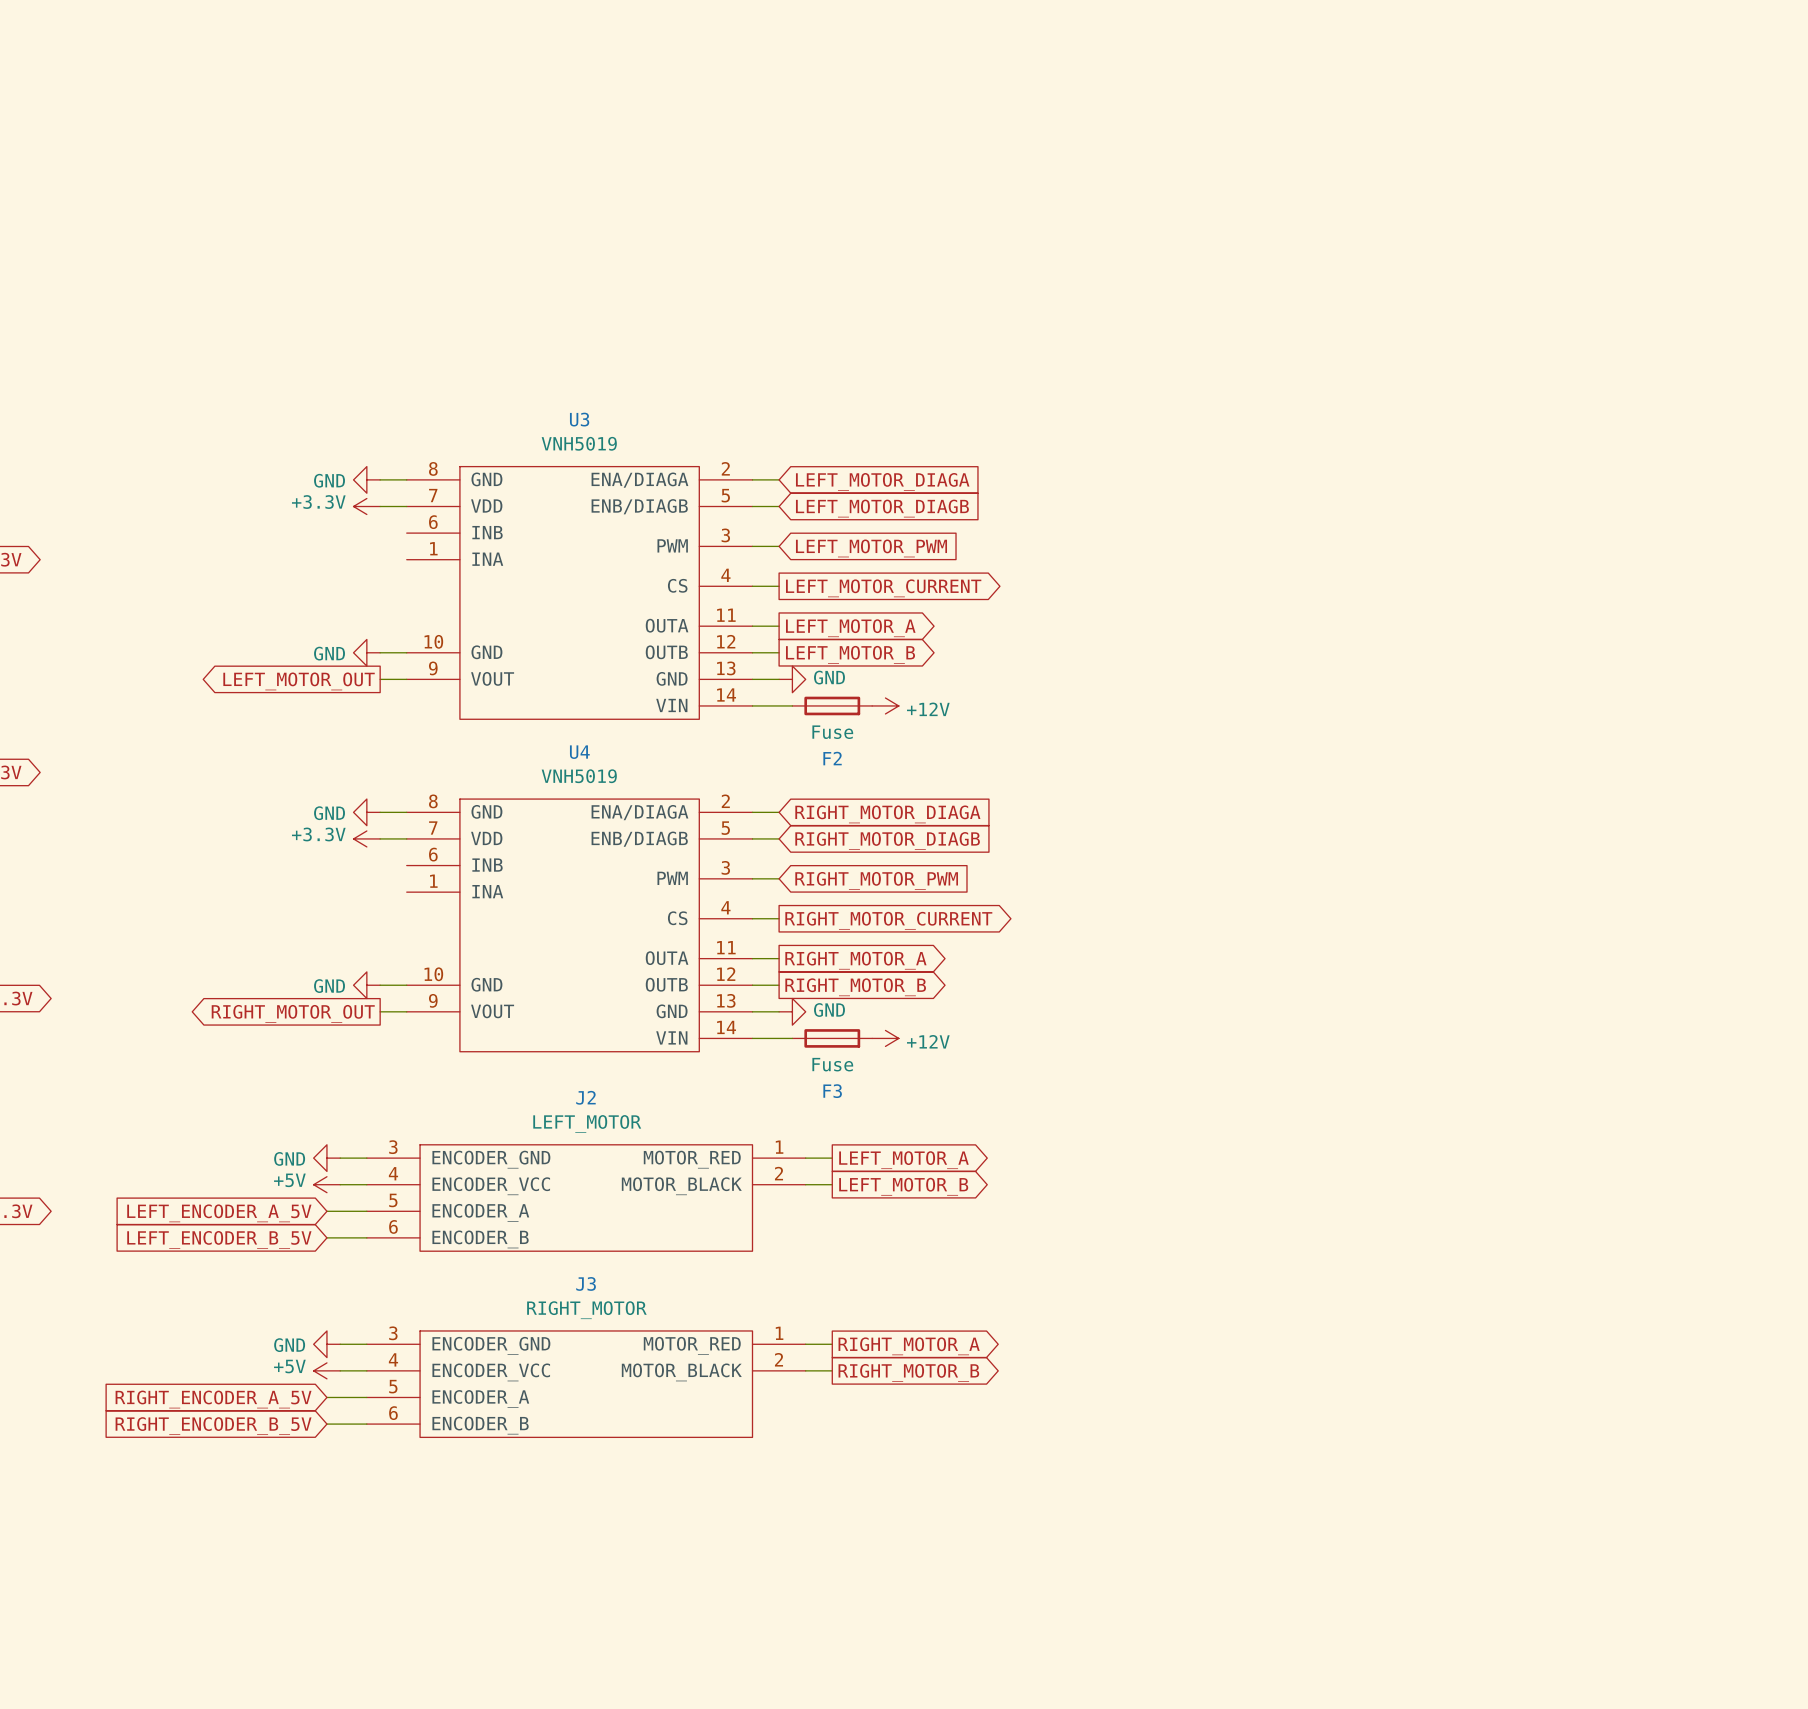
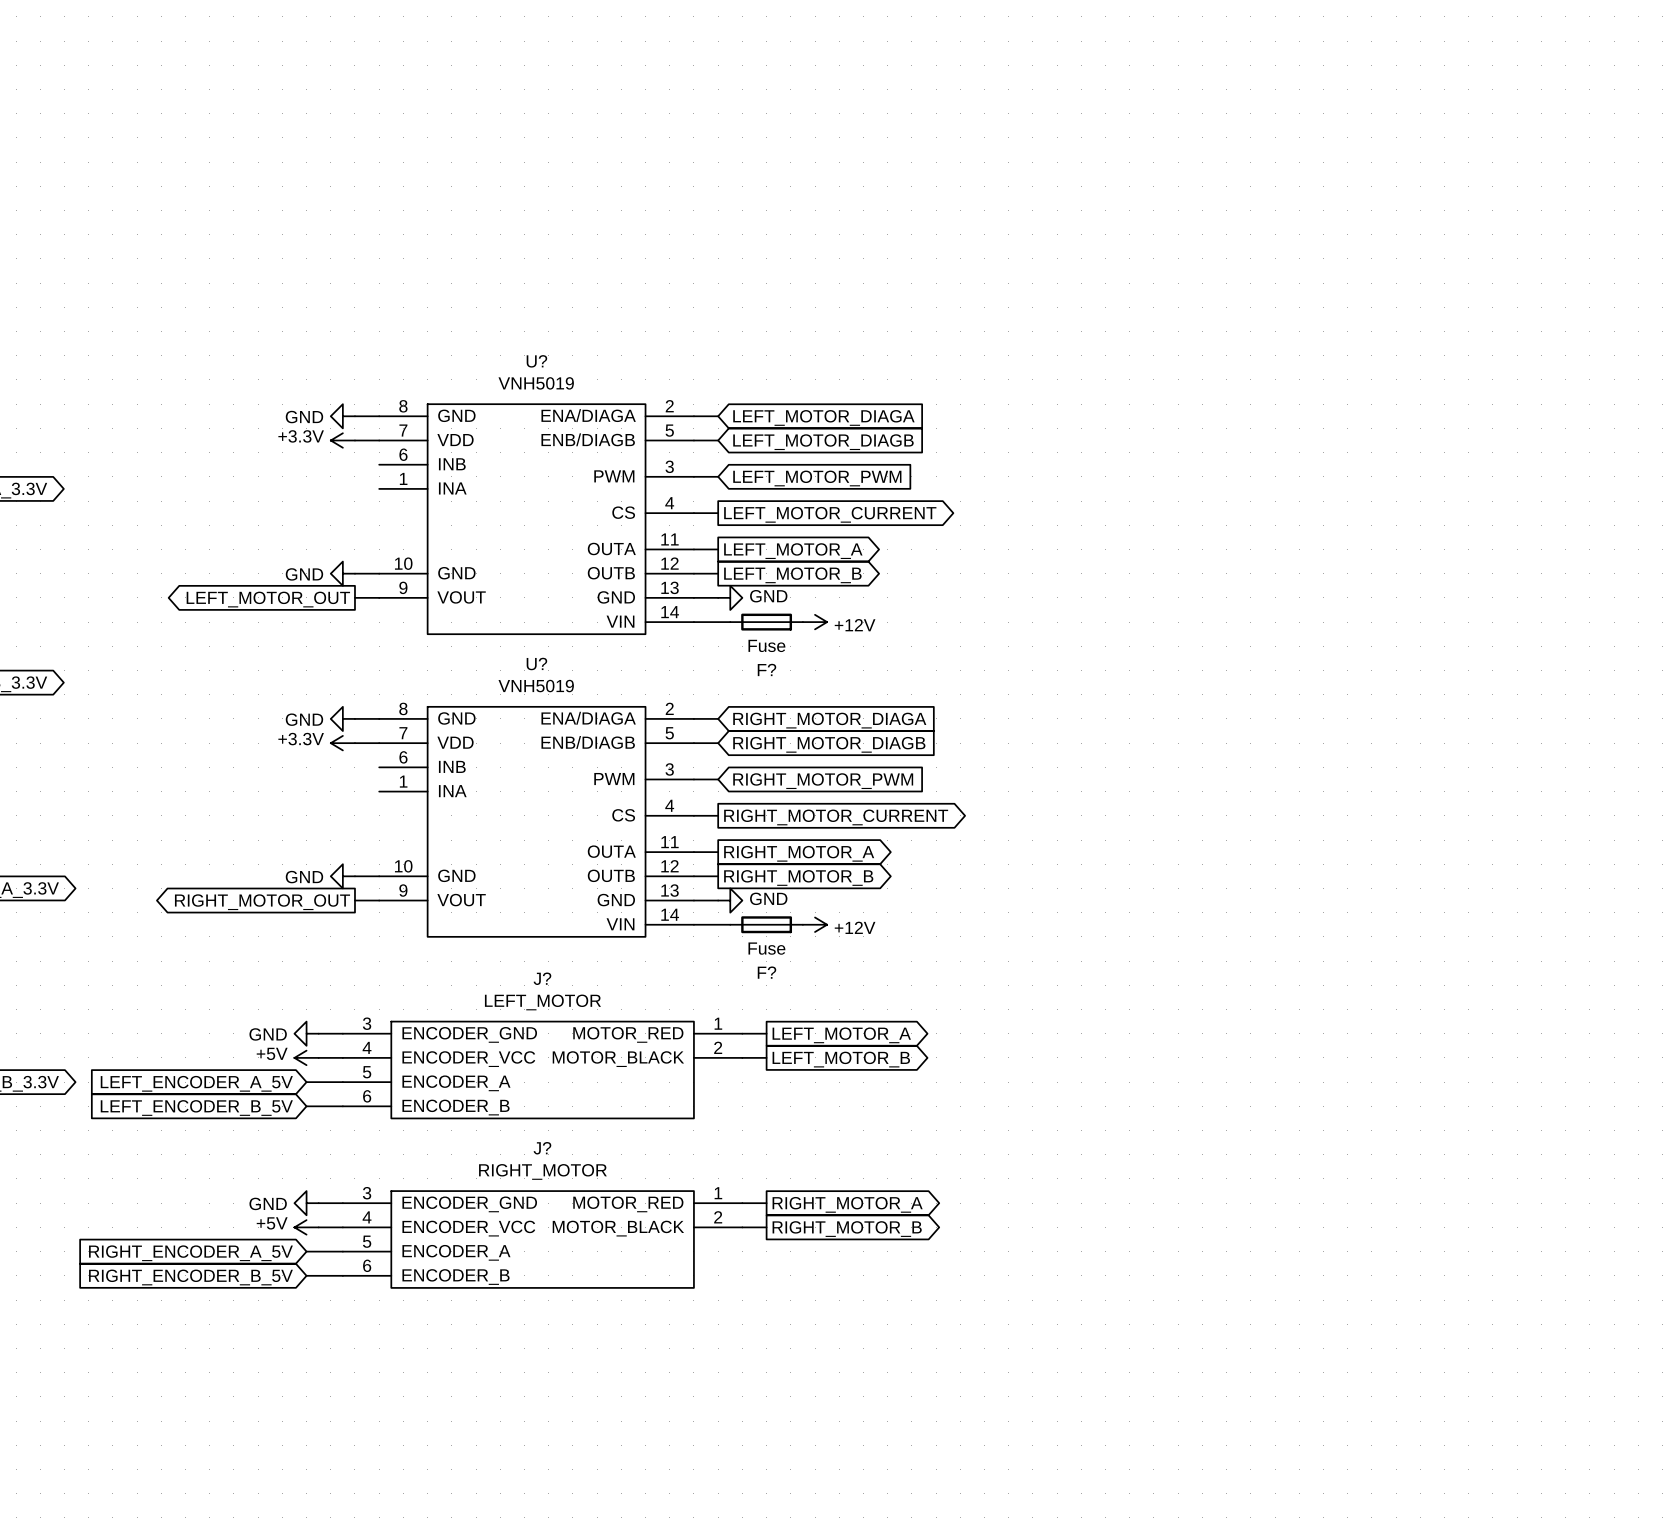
U3 name: U3 (579, 419) -> U? (536, 361)
U4 name: U4 (579, 752) -> U? (536, 664)
F2 name: F2 (832, 758) -> F? (766, 669)
F3 name: F3 (832, 1091) -> F? (766, 972)
J2 name: J2 (585, 1097) -> J? (542, 978)
J3 name: J3 (586, 1283) -> J? (542, 1148)

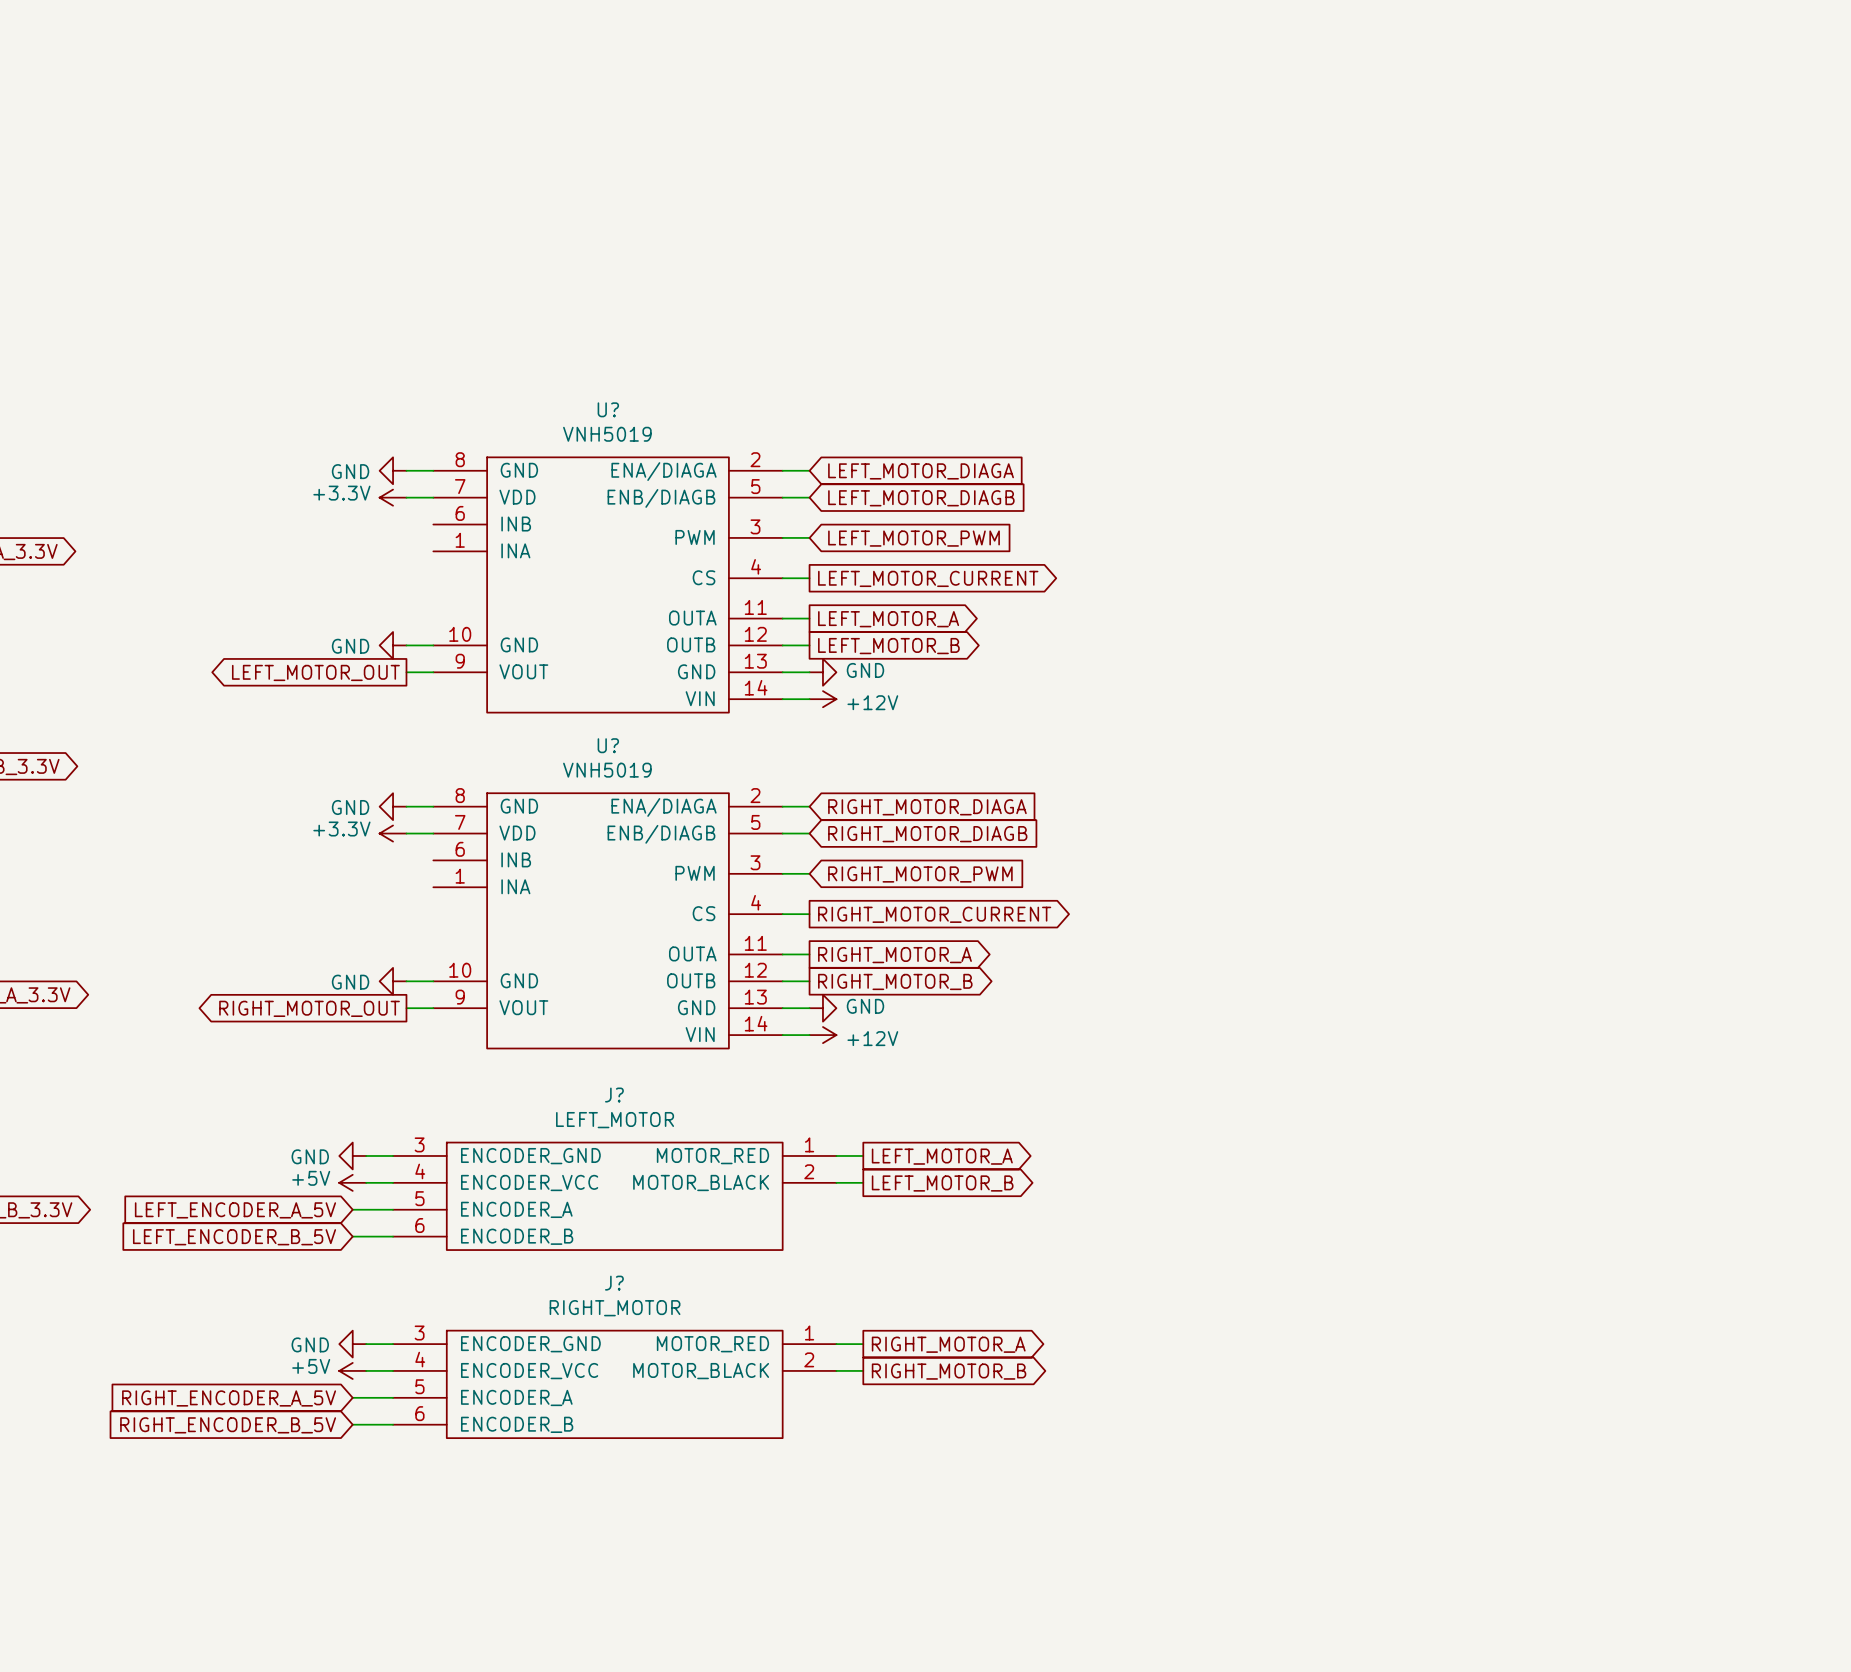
F?: Fuse (766, 622) -> none
power symbol position: +12V (815, 622) -> +12V (822, 699)
F?: Fuse (766, 924) -> none
power symbol position: +12V (815, 924) -> +12V (822, 1035)

